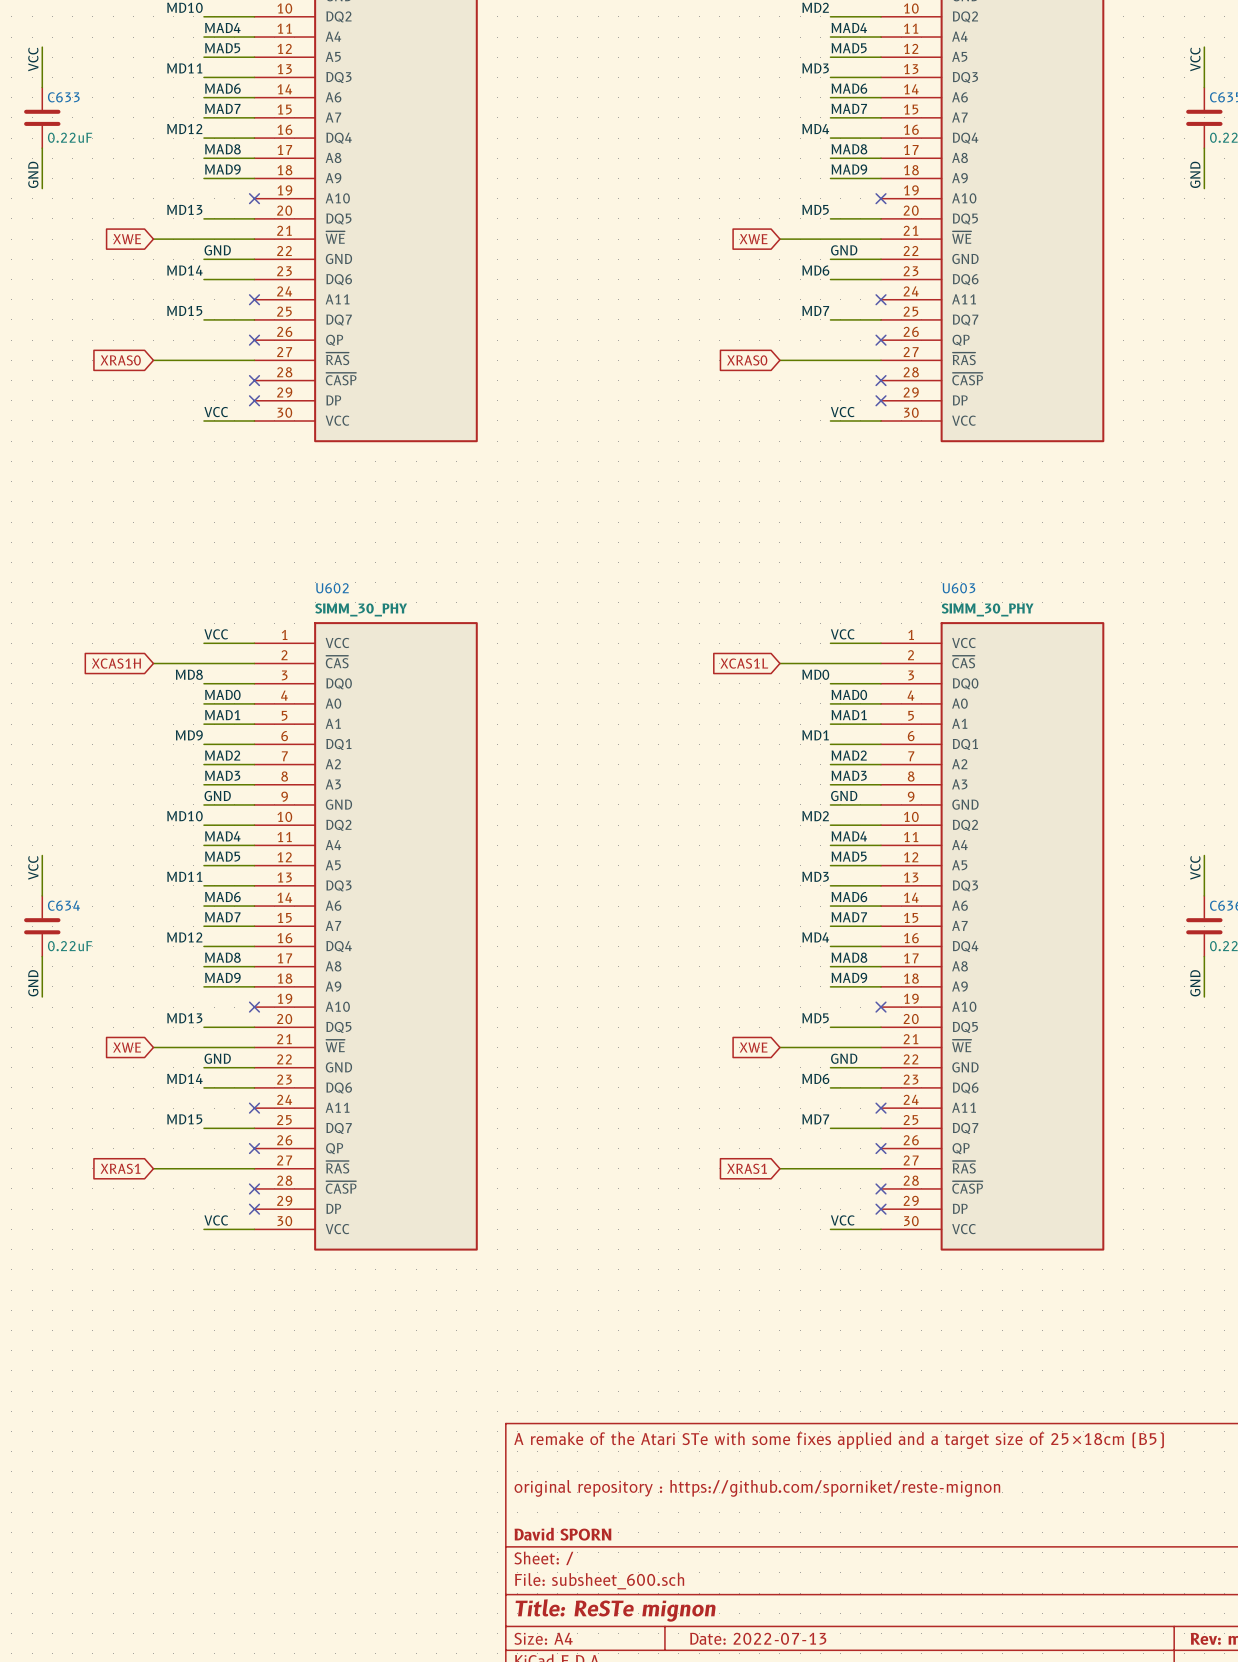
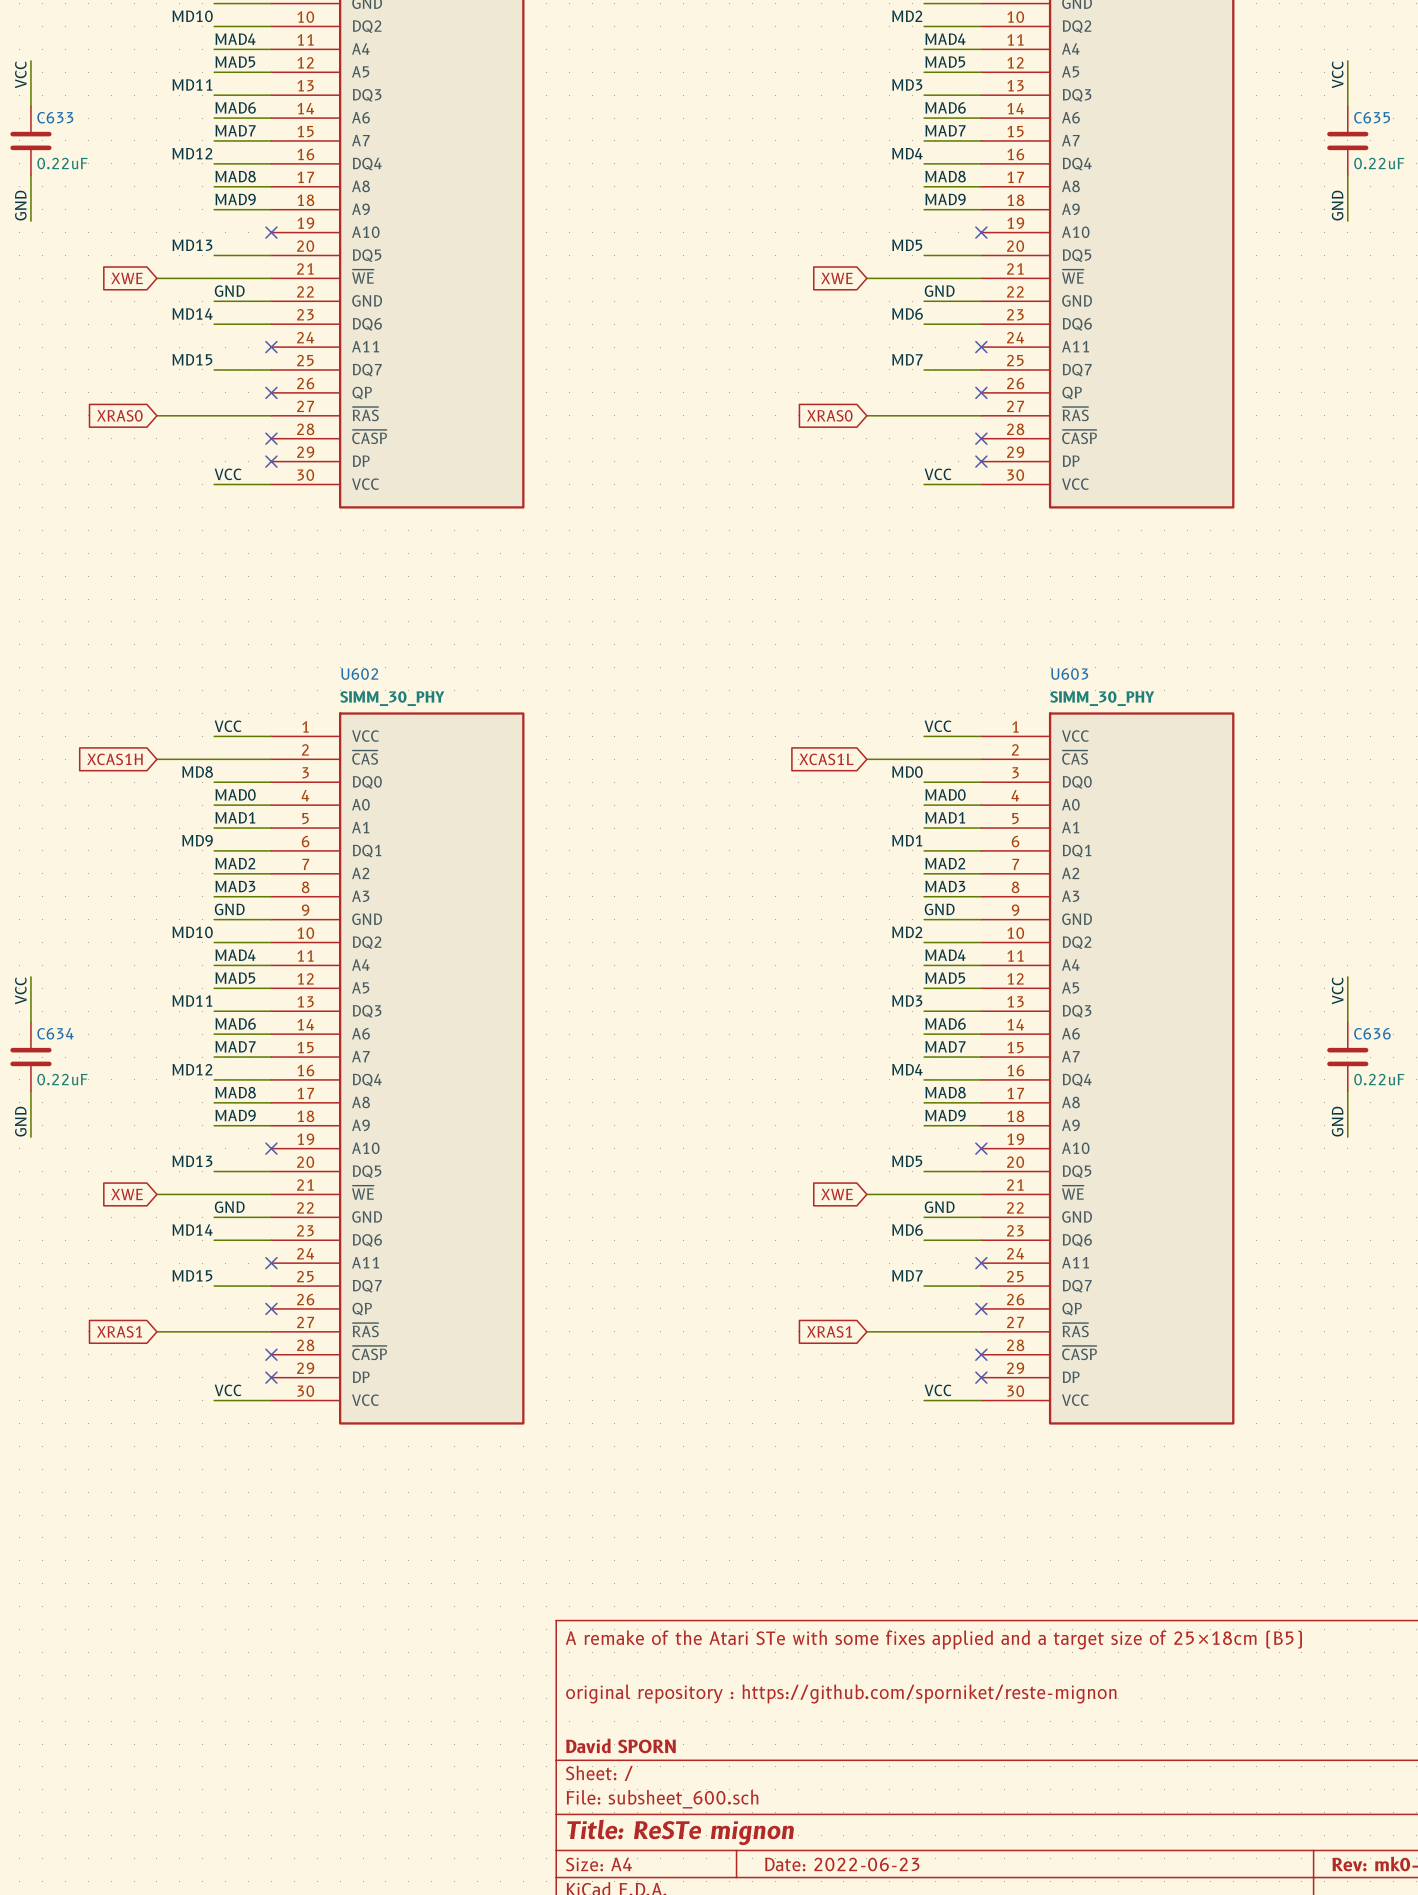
title block: Date: 2022-07-13 (758, 1638) -> Date: 2022-06-23 (842, 1864)

